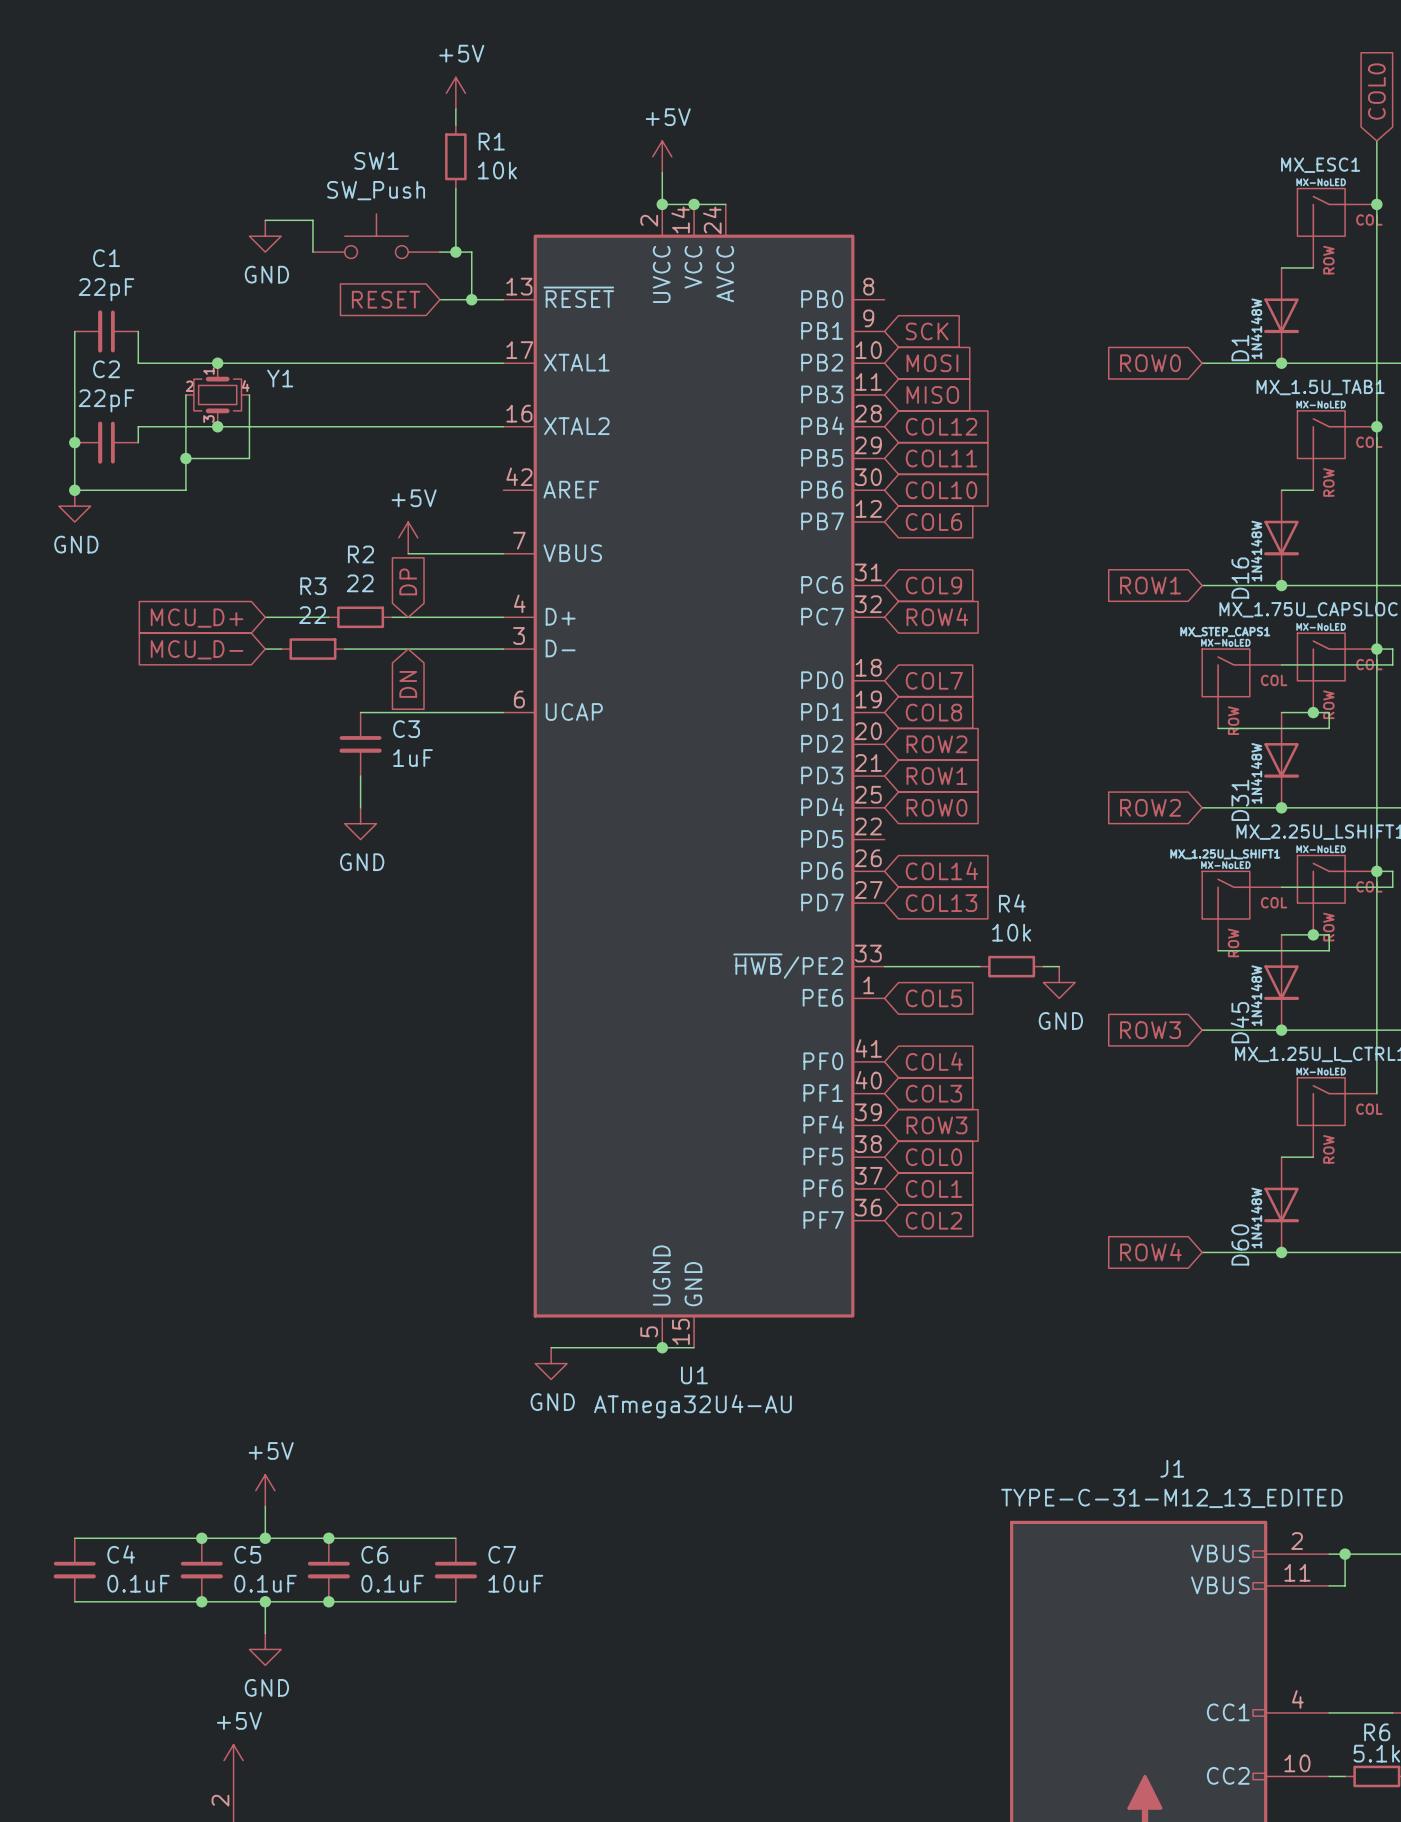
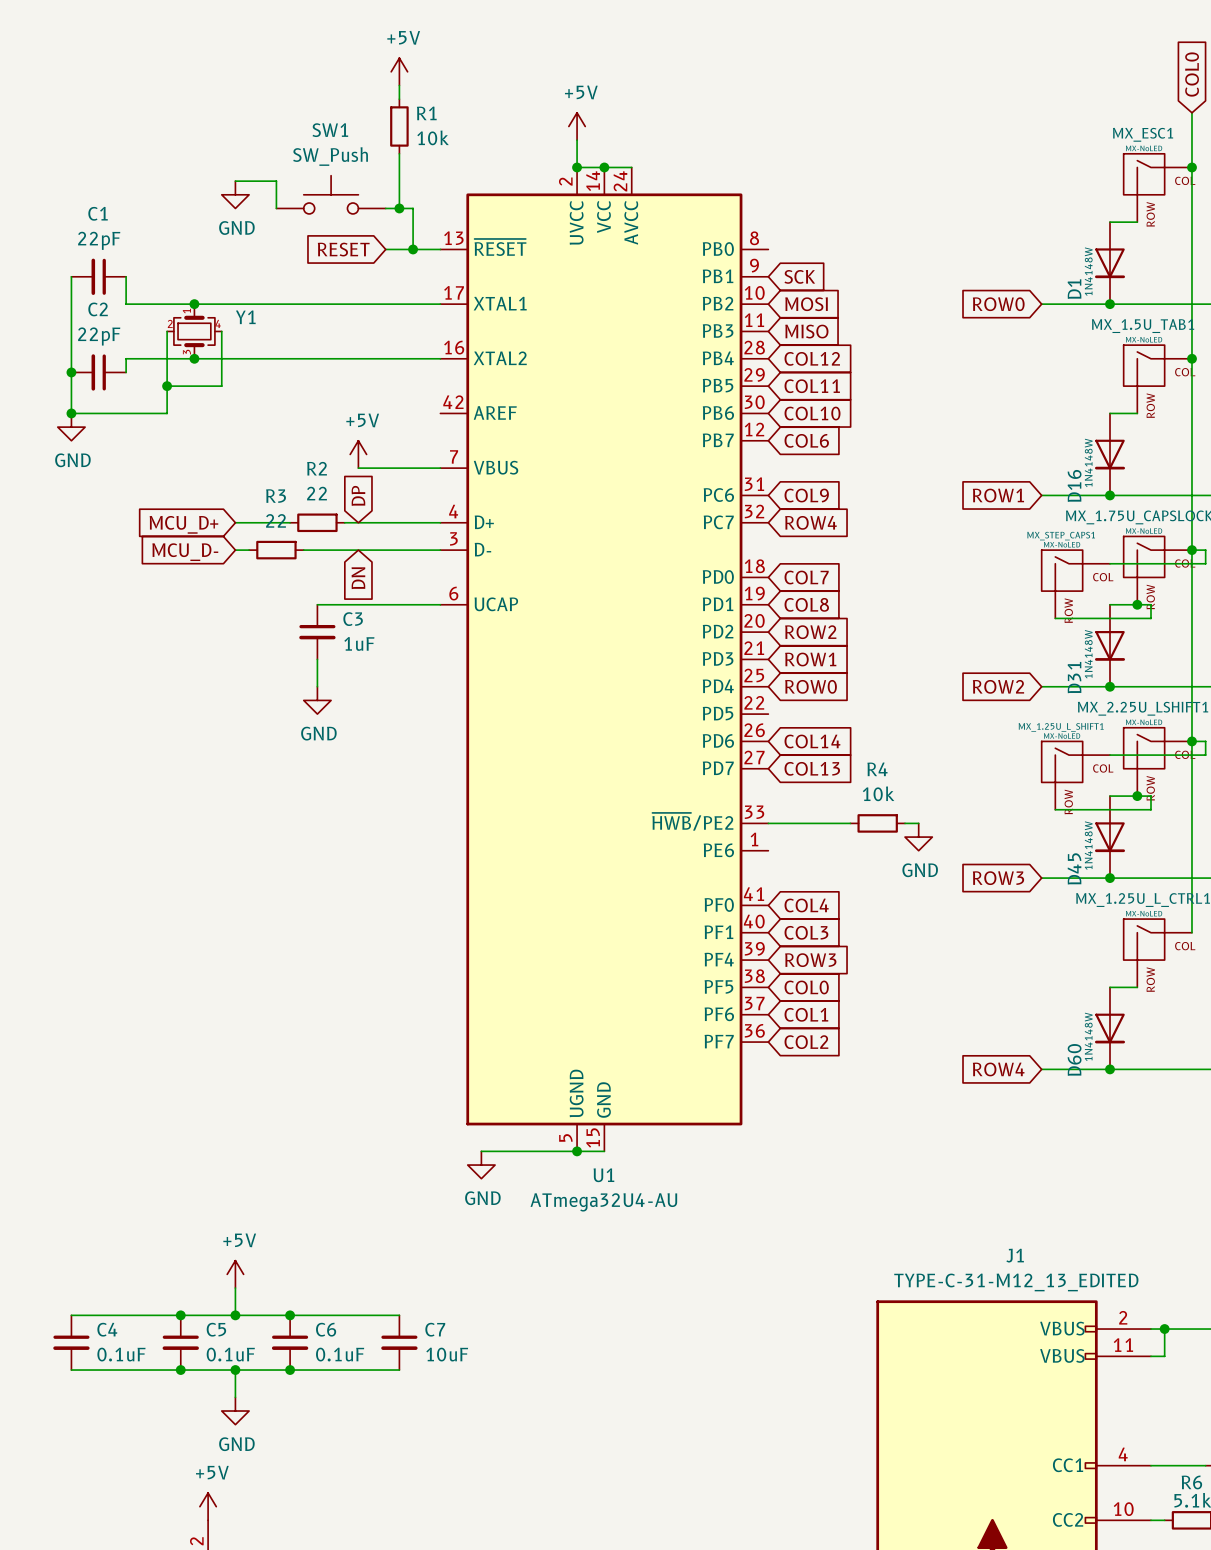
global label: COL5 (933, 998) -> none

